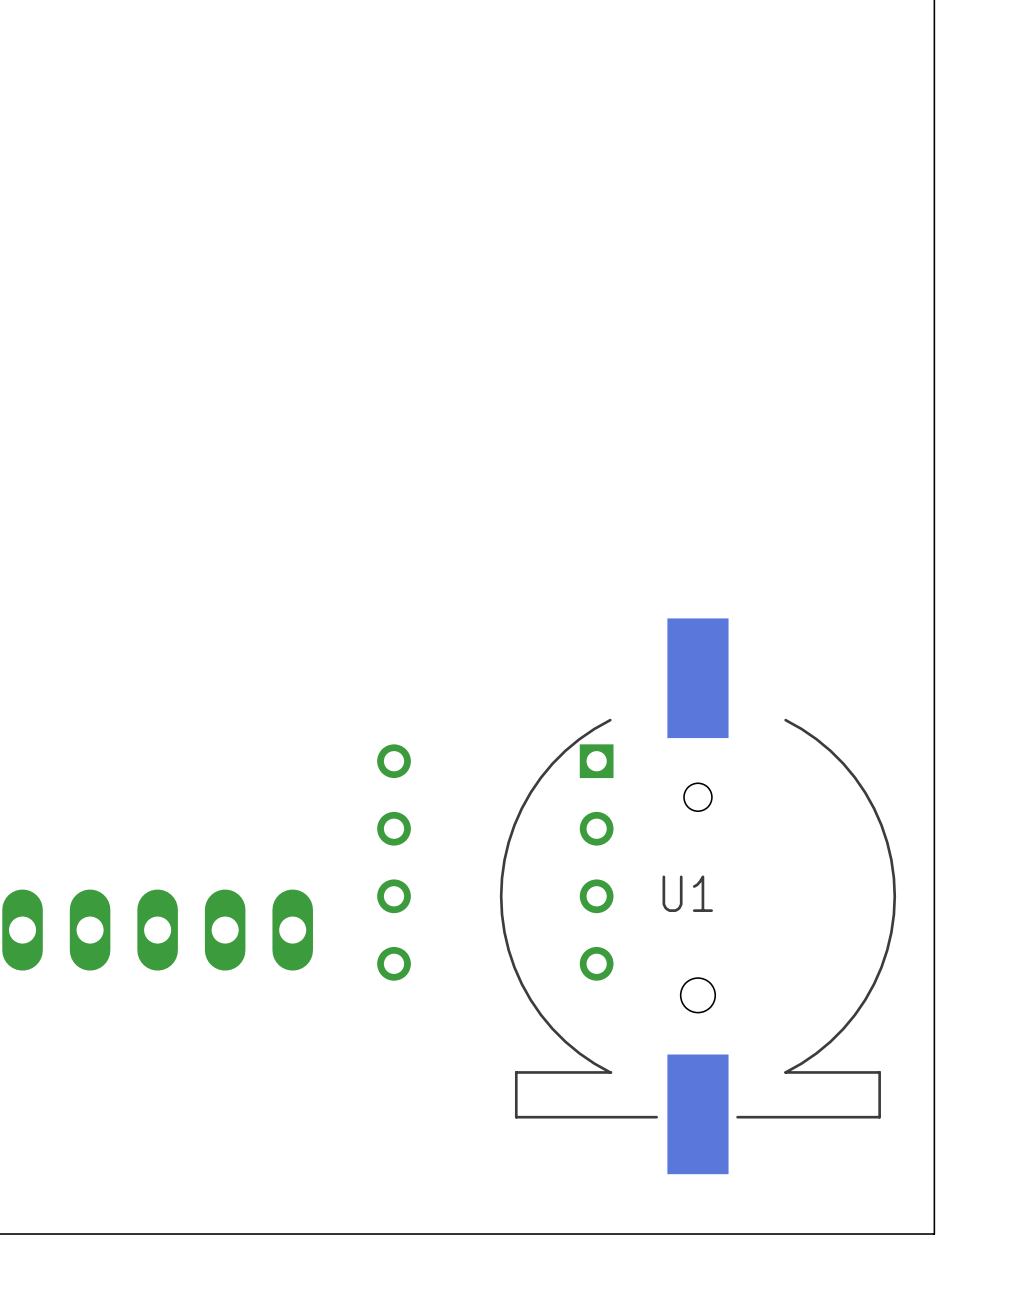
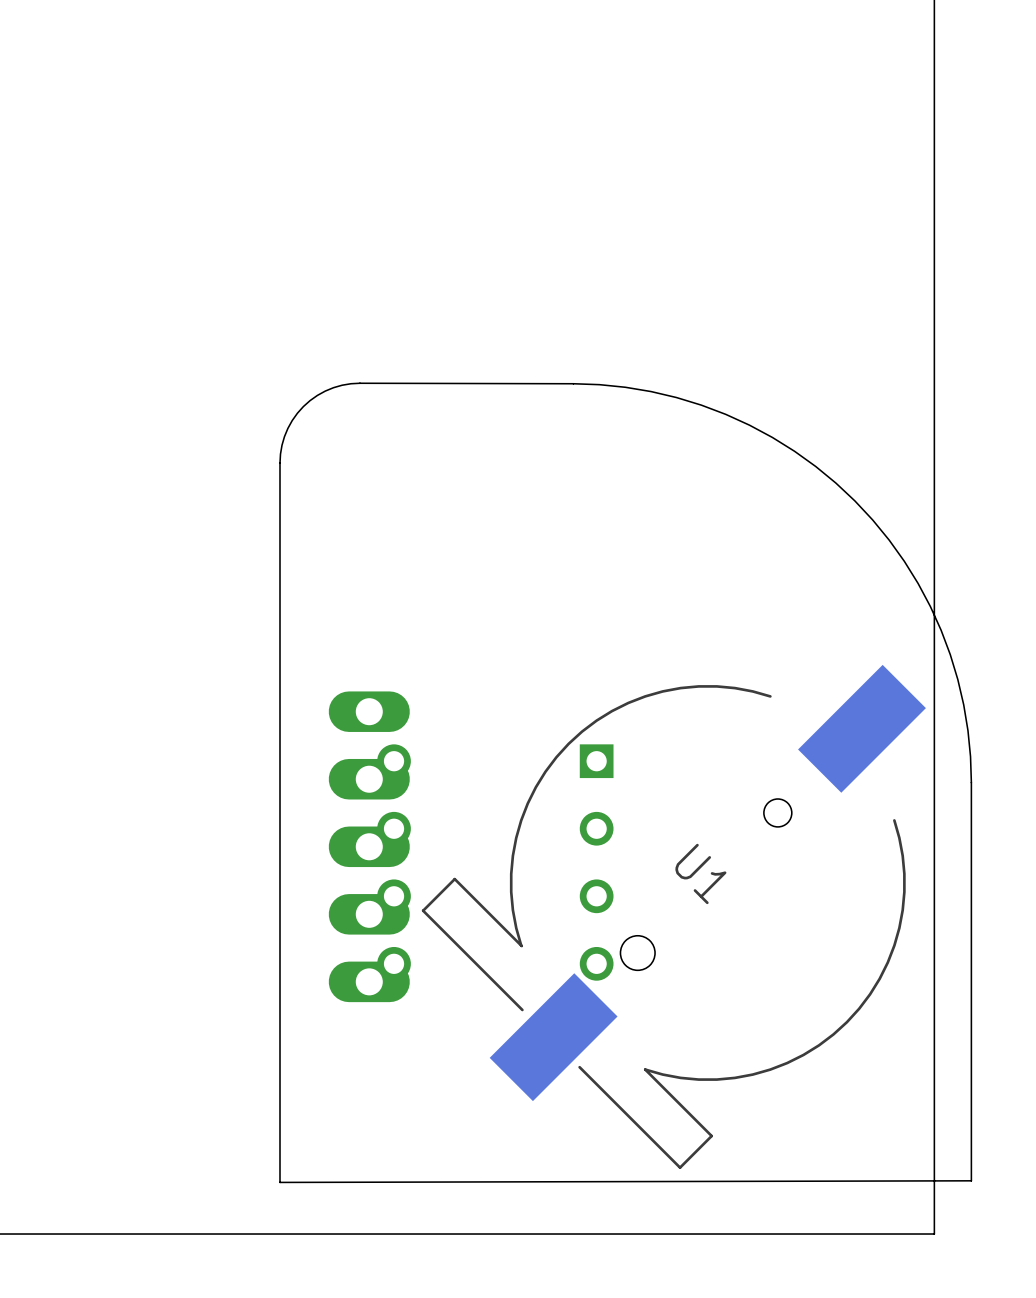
board edge: none -> (359, 383) (599, 384) (625, 387) (676, 397) (701, 405) (749, 425) (794, 451) (835, 483) (854, 500) (889, 540) (918, 583) (941, 630) (957, 679) (967, 730) (971, 782) (971, 1180) (279, 1182) (280, 454) (284, 436) (292, 420) (310, 400) (333, 387) (359, 383)
U1 rotation: 0° (697, 896) -> 45° clockwise (673, 916)
part rotation: 0° (157, 930) -> 90° clockwise (369, 846)
part position: (157, 930) -> (369, 846)

